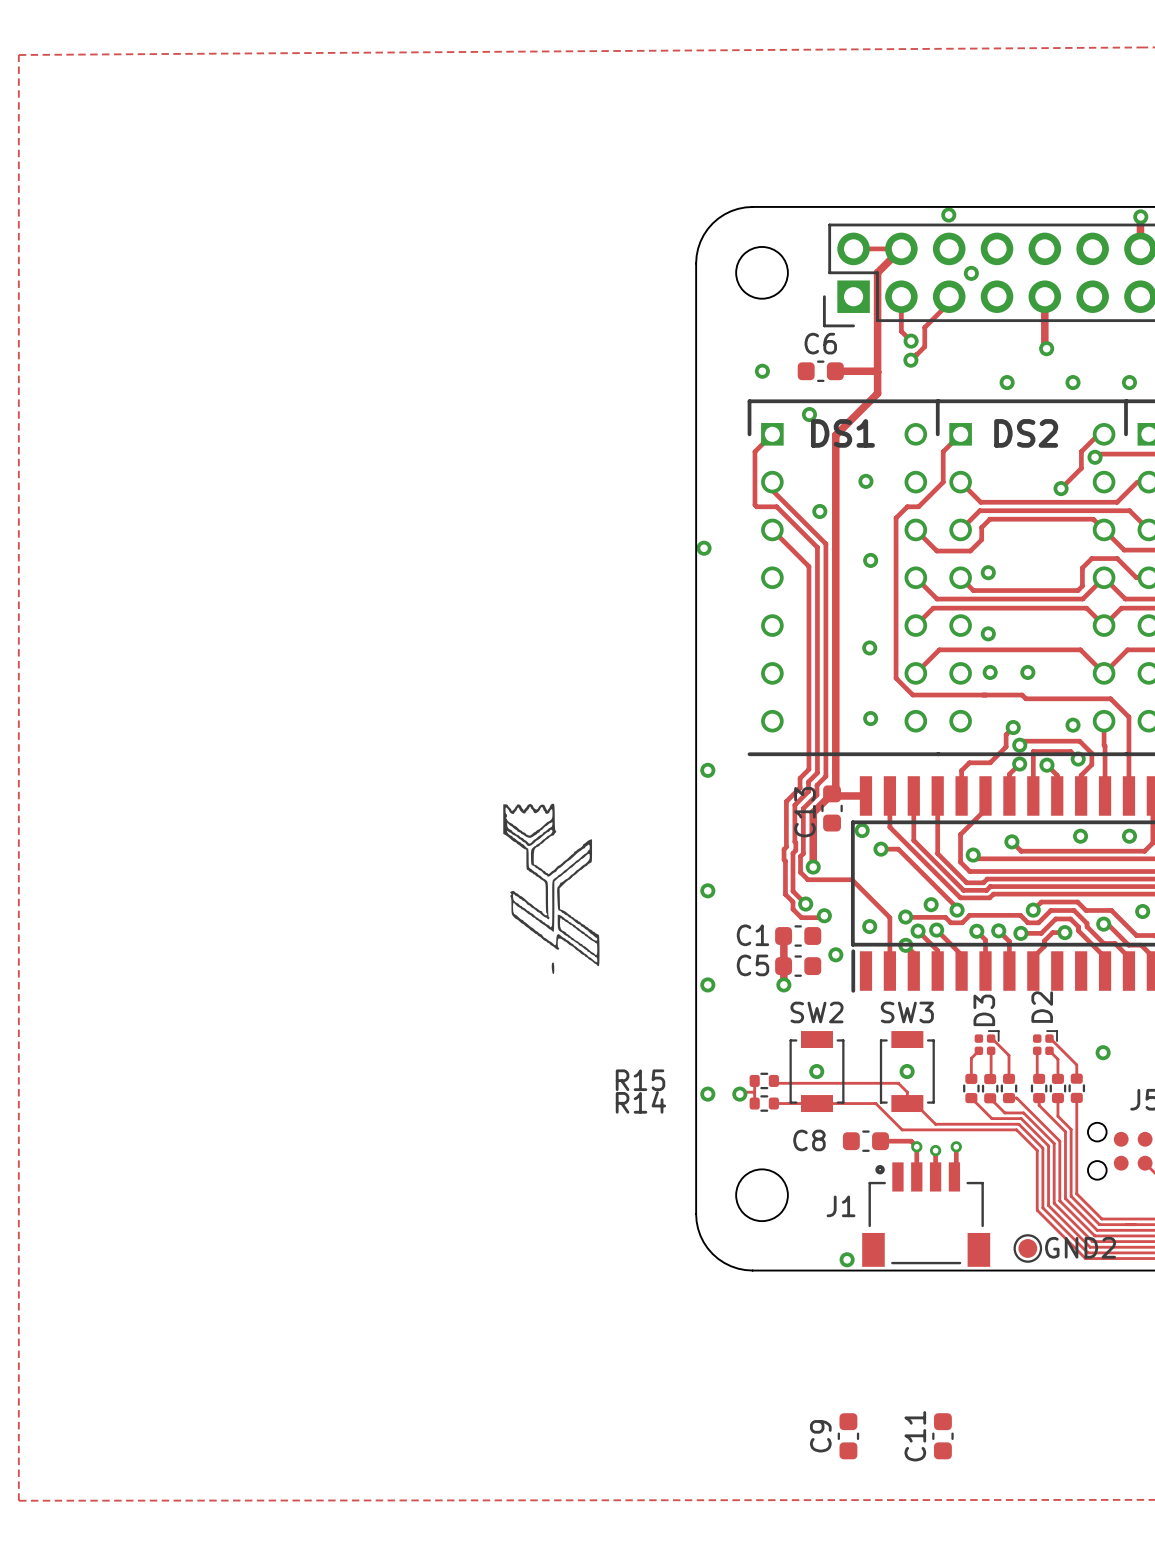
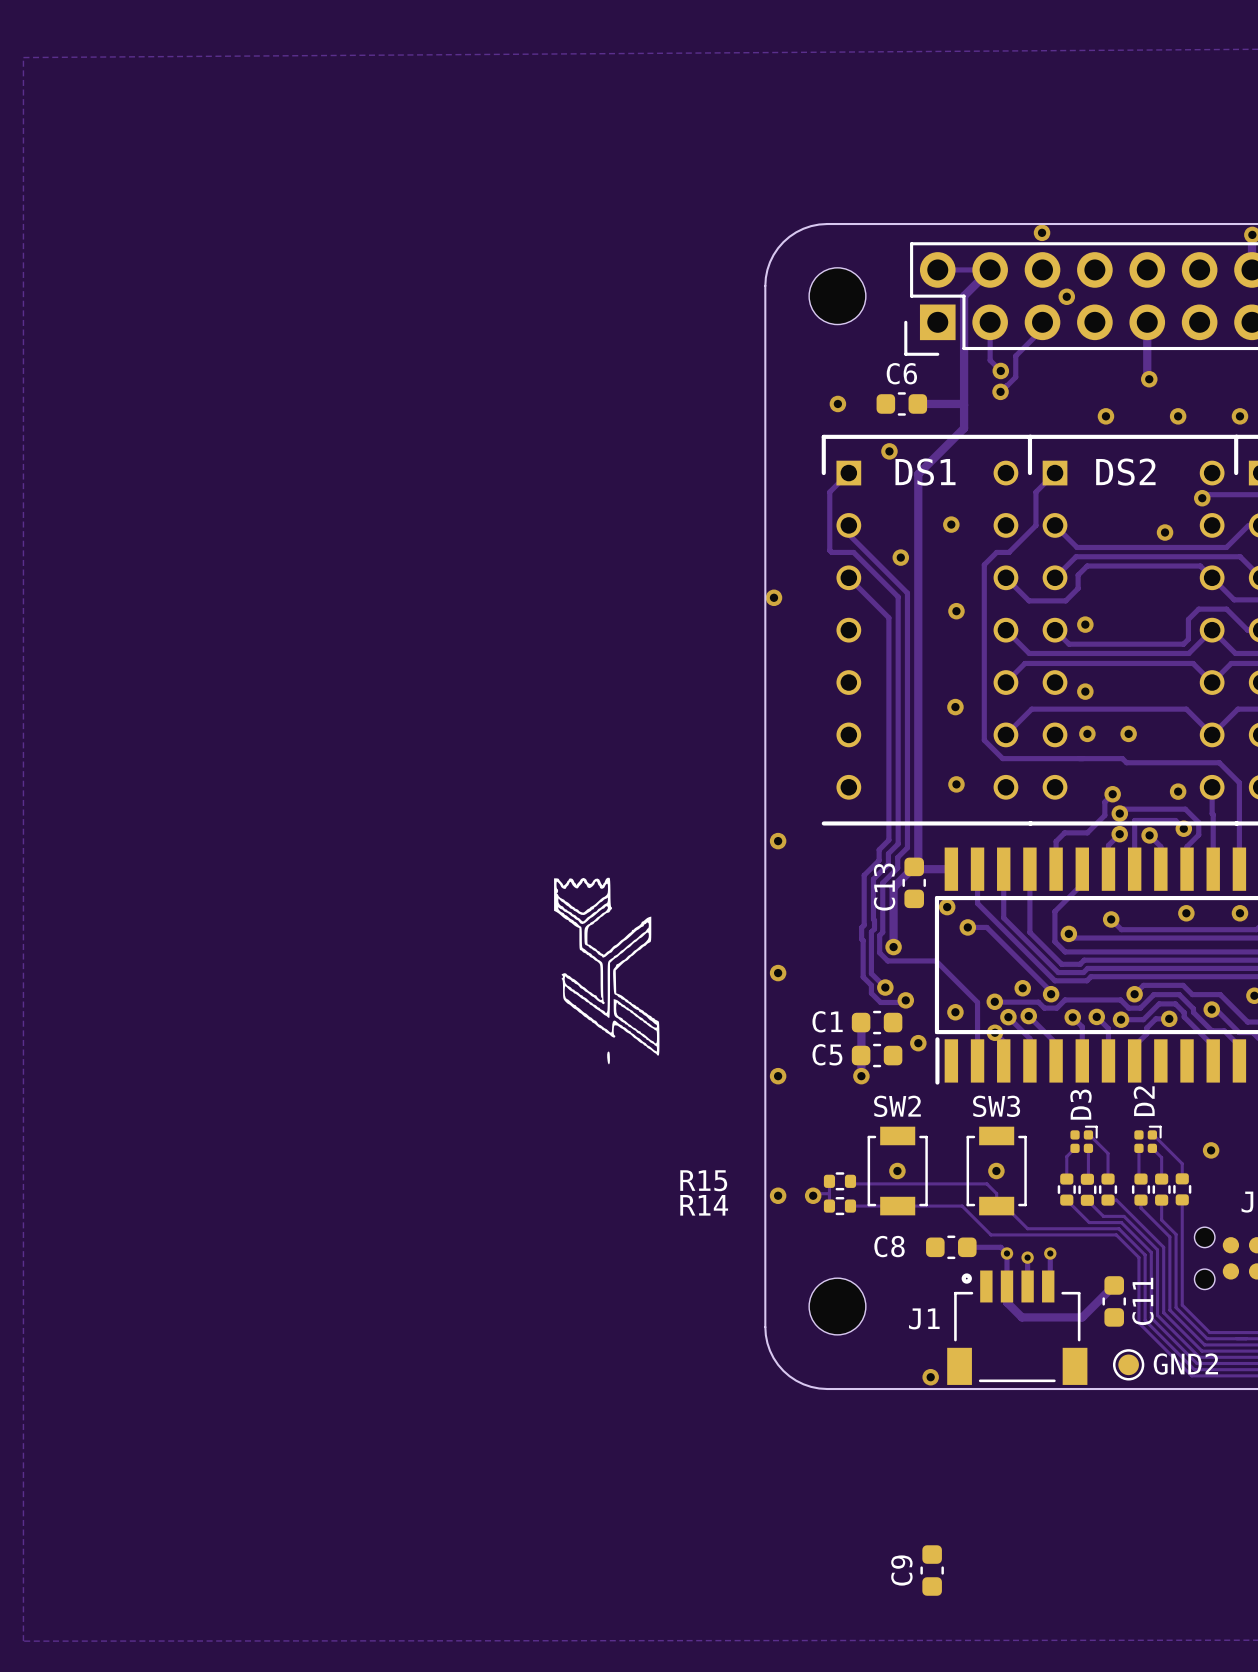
track: (1098, 434) (1081, 451) (1081, 468) (1061, 488) -> none
track: none -> (1114, 1285) (1082, 1317) (1021, 1317) (1006, 1302) (1006, 1286)
C11 name position: C11 (915, 1436) -> C11 (1142, 1301)
C11 position: (942, 1436) -> (1114, 1301)

